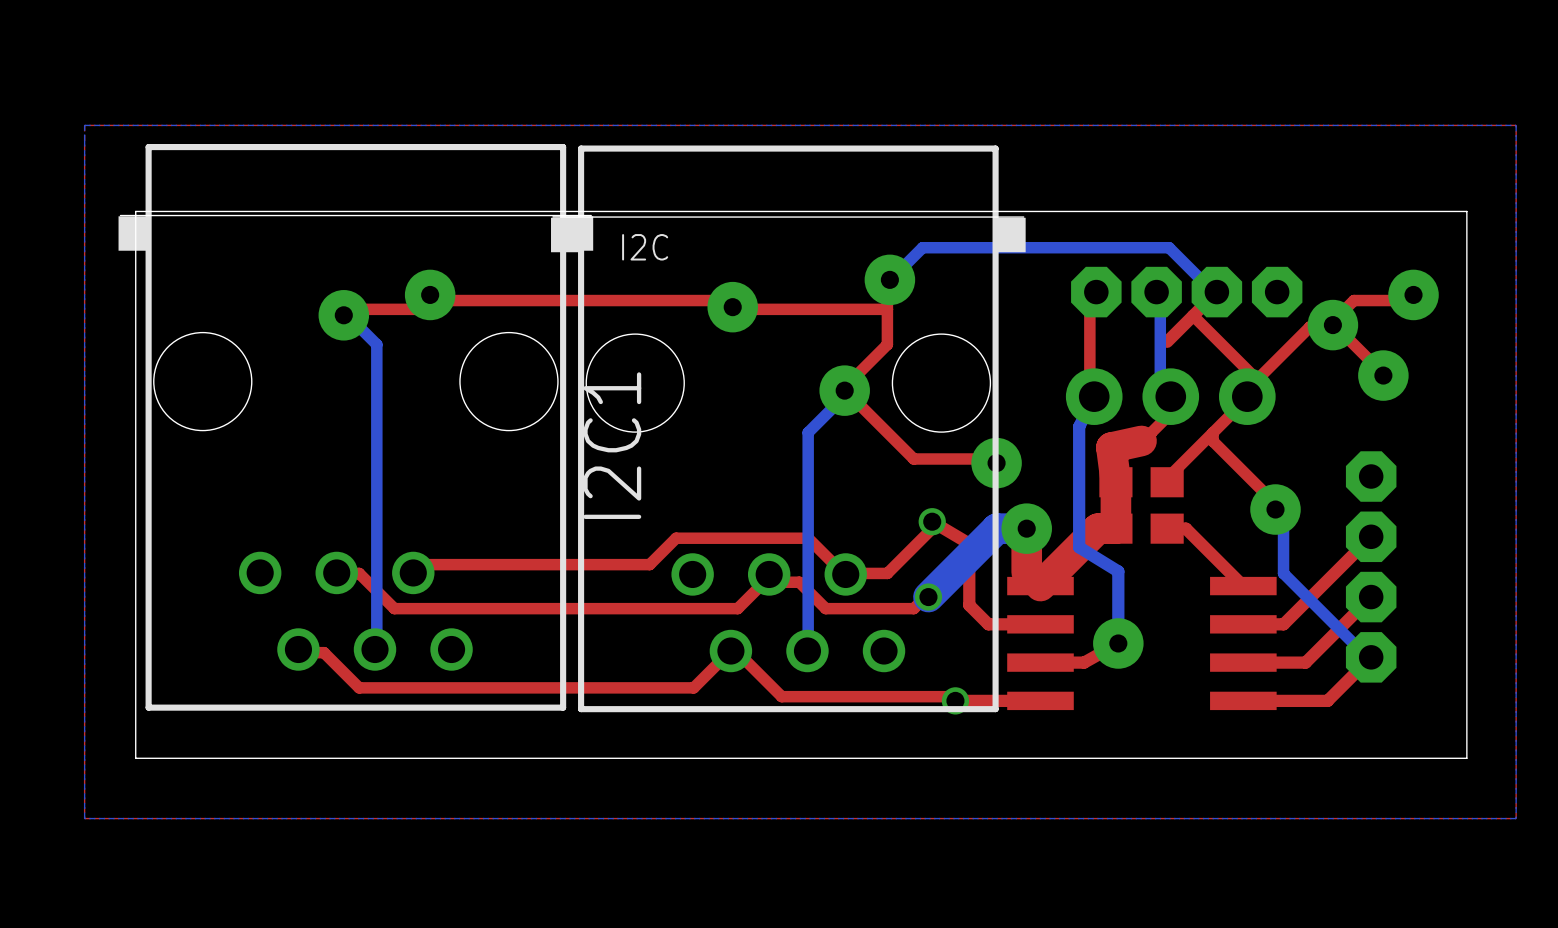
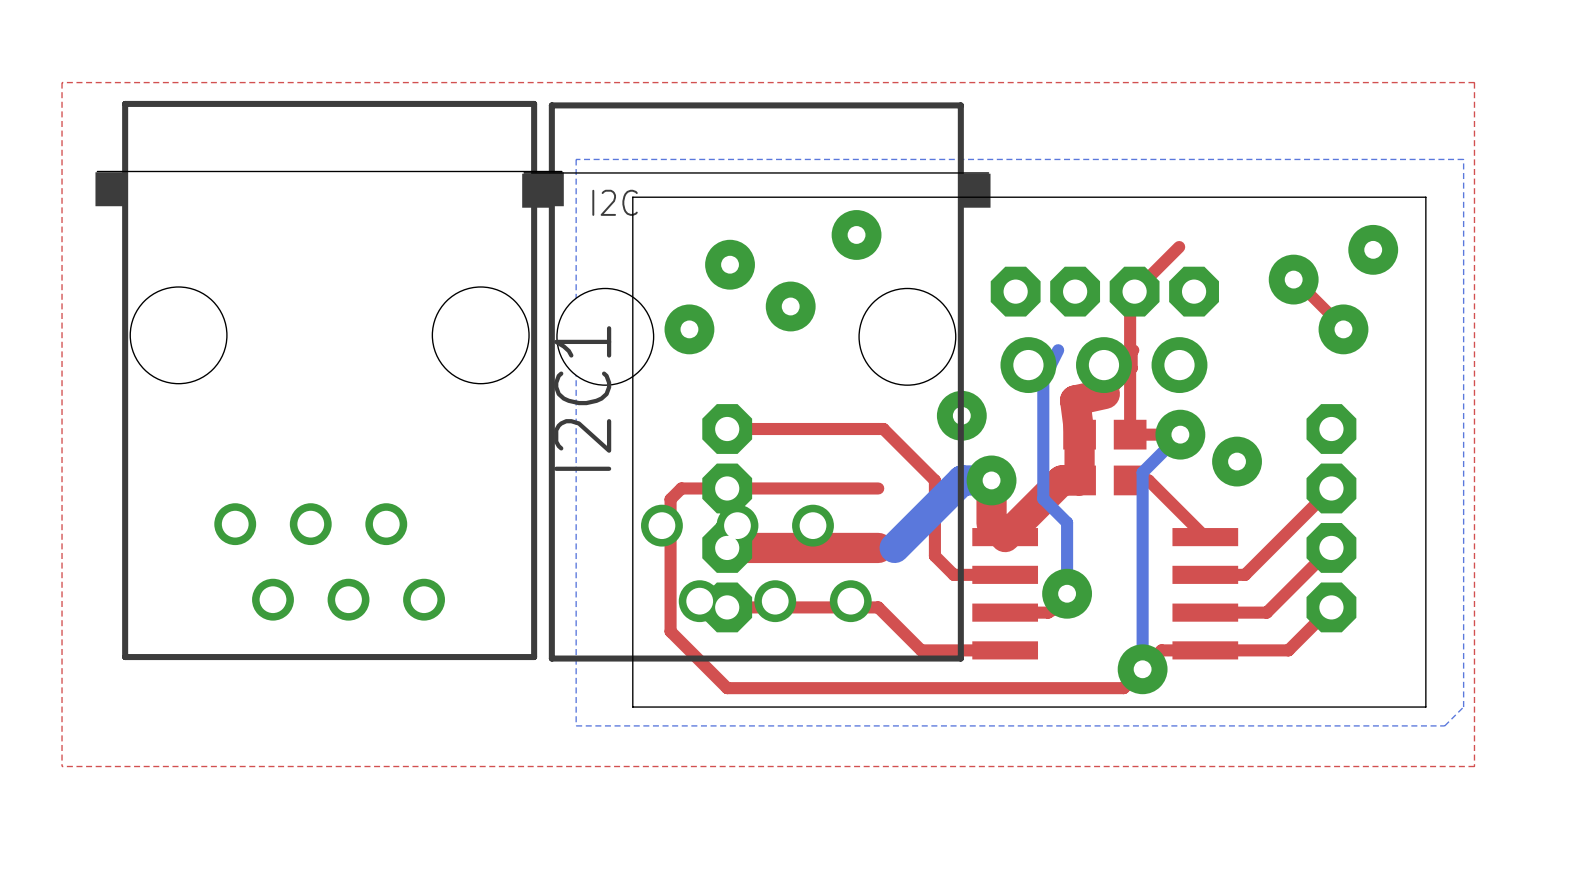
bottom zone outline: (1516, 125) (1516, 818) (84, 818) (84, 125) (1516, 125) -> (1463, 159) (1463, 707) (1444, 725) (576, 725) (576, 159) (1463, 159)
board edge: (1466, 241) (1466, 211) (135, 211) (135, 758) (663, 758) -> (1425, 197) (632, 197) (632, 707)
top track: (889, 279) (887, 282) (887, 344) (843, 388) (913, 458) (993, 458) (996, 463) -> none
bottom track: (889, 279) (922, 247) (1169, 247) (1213, 291) (1216, 292) -> none
top track: (1096, 292) (1089, 300) (1089, 388) (1094, 396) -> none
bottom track: (1156, 292) (1160, 300) (1160, 379) (1169, 388) (1170, 396) -> none
part position: (1186, 292) -> (1104, 291)
via: (430, 294) -> none
top track: (1413, 294) (1406, 300) (1353, 300) (1336, 318) (1332, 325) (1309, 326) (1248, 388) (1247, 396) -> none
via position: (732, 307) -> (730, 264)
top track: (887, 309) (737, 309) (732, 307) (728, 300) (438, 300) (430, 294) (429, 300) (420, 309) (350, 309) (343, 315) -> none
bottom track: (343, 315) (350, 318) (376, 344) (376, 643) (375, 649) -> none
via: (343, 315) -> none
top track: (1193, 315) (1257, 379) (1247, 396) -> none
top track: none -> (1130, 296) (1130, 434) (1180, 434)
via: none -> (689, 329)
bottom track: (844, 390) (843, 397) (808, 432) (807, 651) -> none
via position: (844, 390) -> (790, 306)
part position: (1170, 396) -> (1103, 365)
top track: (1247, 396) (1169, 476) (1167, 482) -> none
top track: (1213, 432) (1213, 441) (1274, 503) (1275, 509) -> none
bottom track: none -> (1180, 434) (1142, 472) (1142, 669)
via: none -> (1180, 434)
bottom track: (1275, 509) (1283, 511) (1283, 573) (1362, 652) (1371, 657) -> none
via: (932, 521) -> none
top track: none -> (878, 488) (681, 488) (670, 499) (670, 631) (727, 688) (1123, 688) (1161, 650) (1205, 650)
top track: (969, 543) (932, 521) (931, 529) (887, 573) (843, 573) (808, 538) (676, 538) (649, 564) (420, 564) (413, 572) -> (934, 495) (934, 480) (883, 429) (727, 429)
bottom track: (1079, 547) (1118, 571) (1118, 643) -> (1043, 498) (1067, 522) (1067, 593)
part: none -> (727, 518)
top track: (336, 572) (359, 573) (394, 608) (737, 608) (764, 582) (769, 574) (772, 582) (799, 582) (825, 608) (913, 608) (928, 597) -> none
top track: none -> (878, 547) (727, 547)
via: (928, 597) -> none
via position: (1118, 643) -> (1067, 593)
top track: (298, 649) (306, 652) (324, 652) (359, 687) (693, 687) (730, 651) (737, 652) (781, 696) (949, 696) (955, 700) -> (727, 607) (878, 607) (921, 650)
via: (955, 700) -> none
via: none -> (1142, 669)

